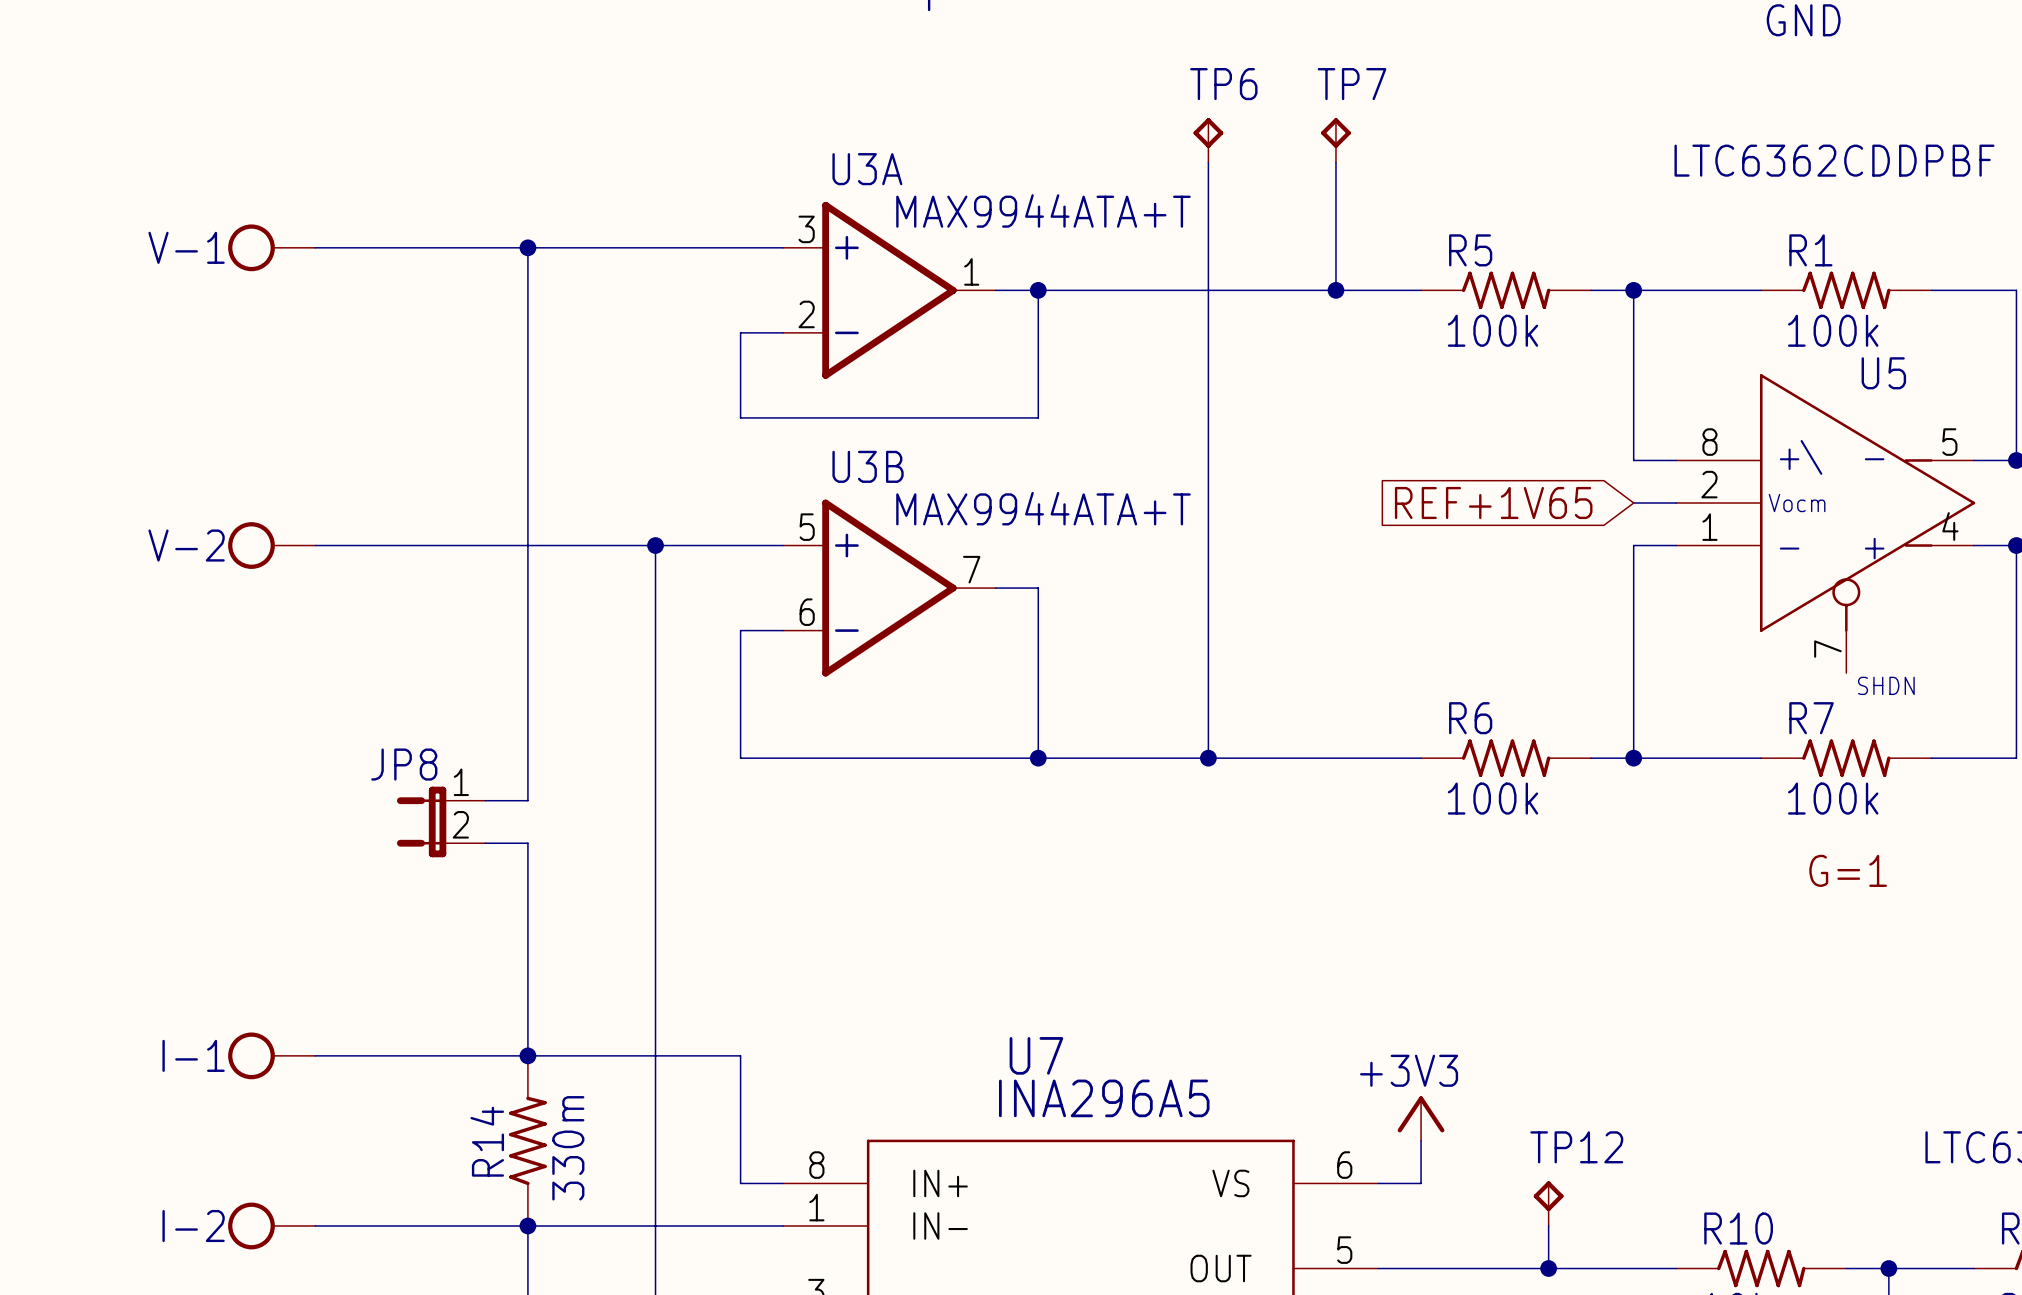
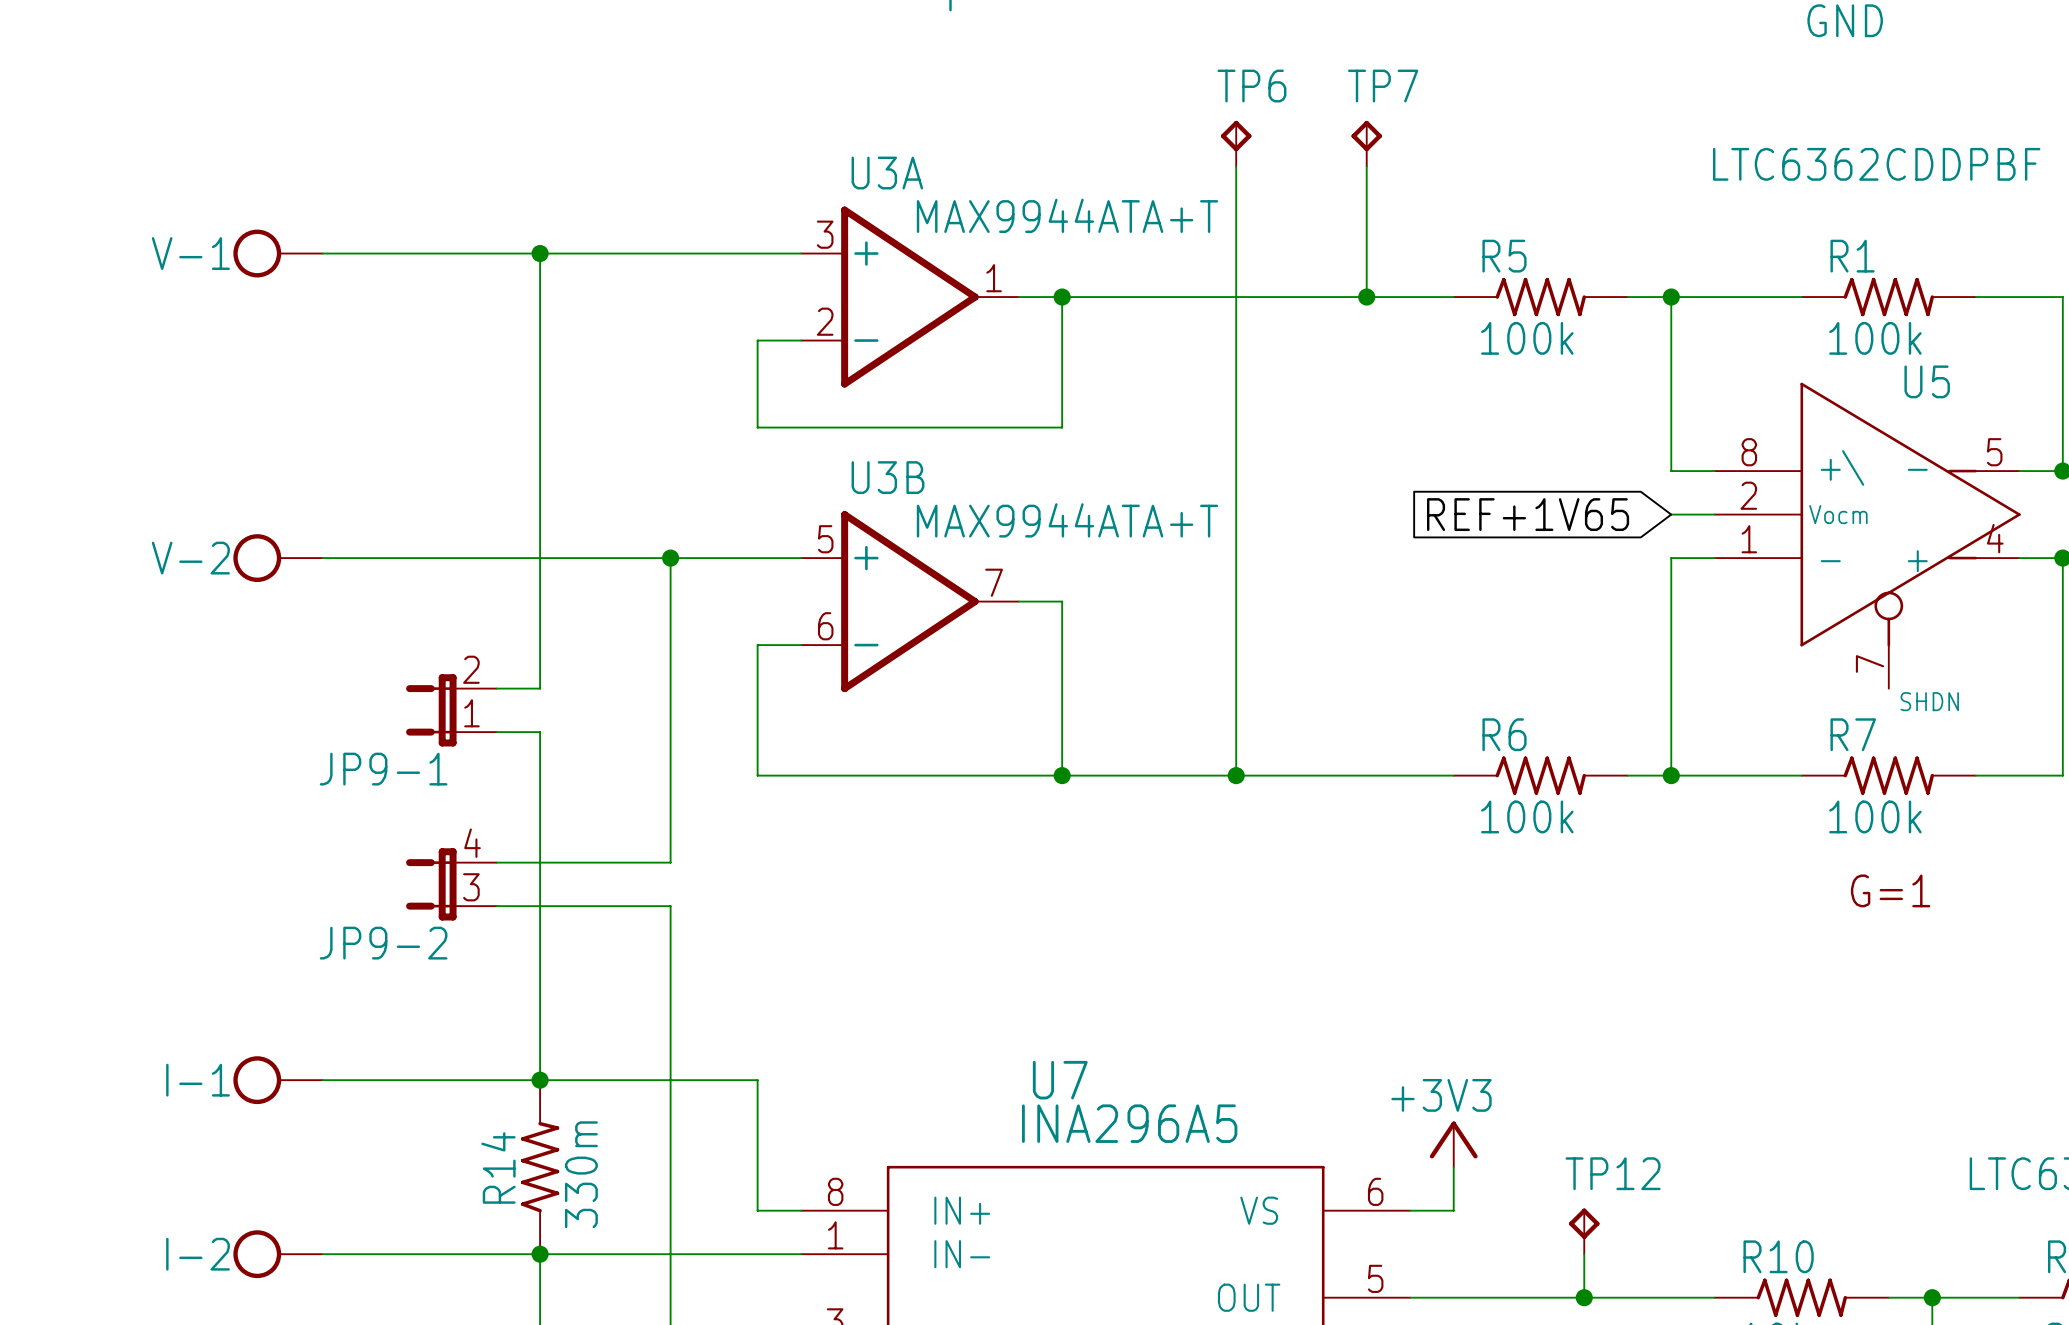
wire: (527, 673) (527, 715) -> (540, 688) (496, 688)
JP9-1: none -> (451, 710)
wire: (485, 800) (527, 800) -> (496, 732) (540, 732)
JP8: (441, 821) -> none
wire: (655, 843) (655, 885) -> (670, 862) (540, 862) (540, 819)
JP9-2: none -> (451, 884)
wire: none -> (496, 906) (670, 906)

